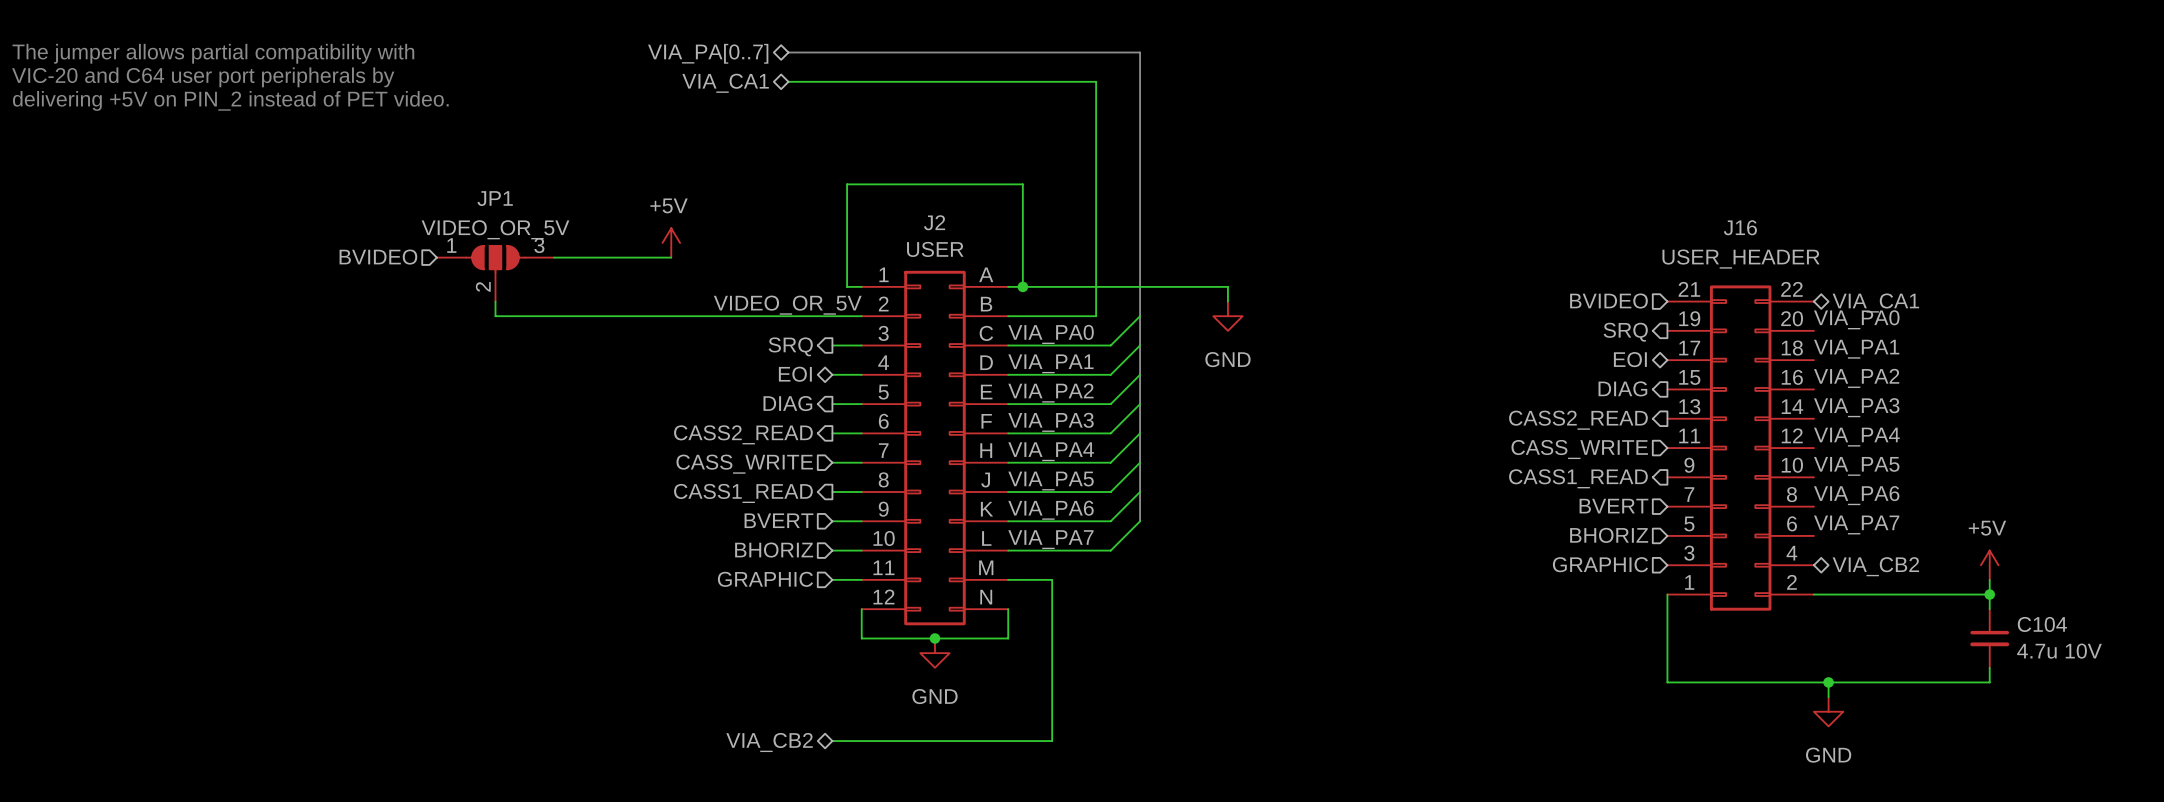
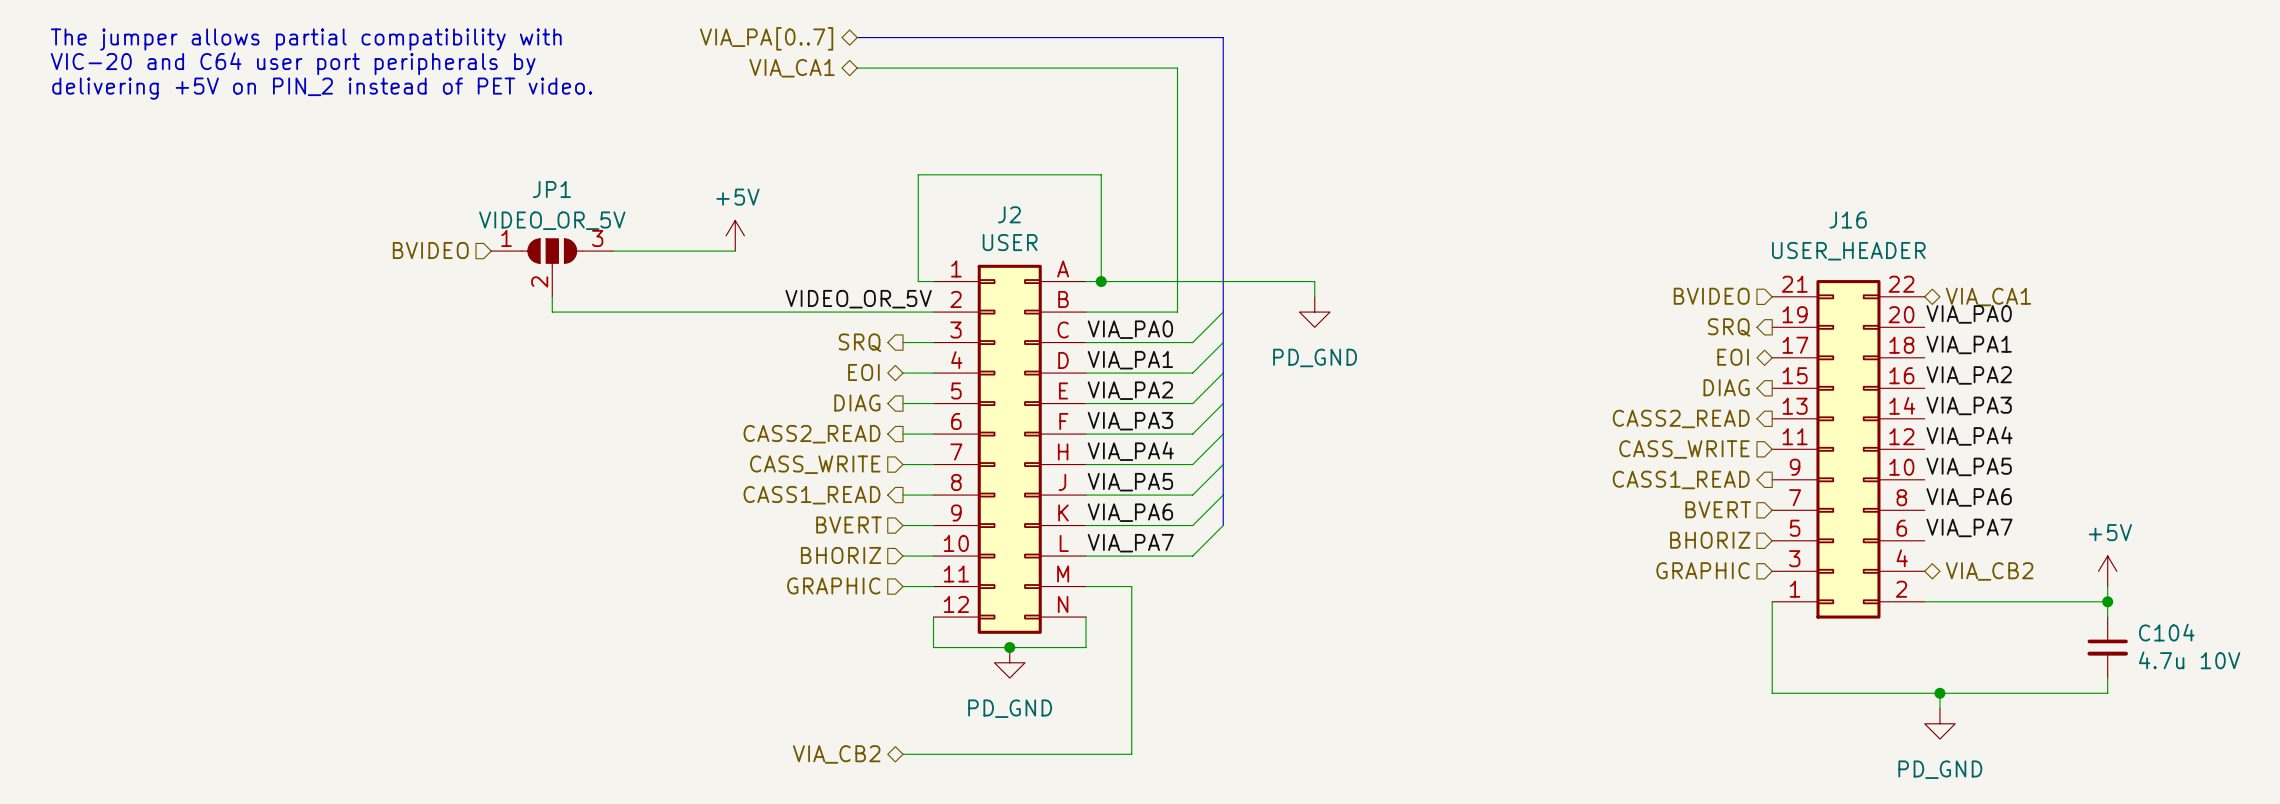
power symbol: GND (1227, 316) -> PD_GND (1314, 312)
power symbol: GND (934, 653) -> PD_GND (1009, 662)
power symbol: GND (1828, 711) -> PD_GND (1939, 723)

